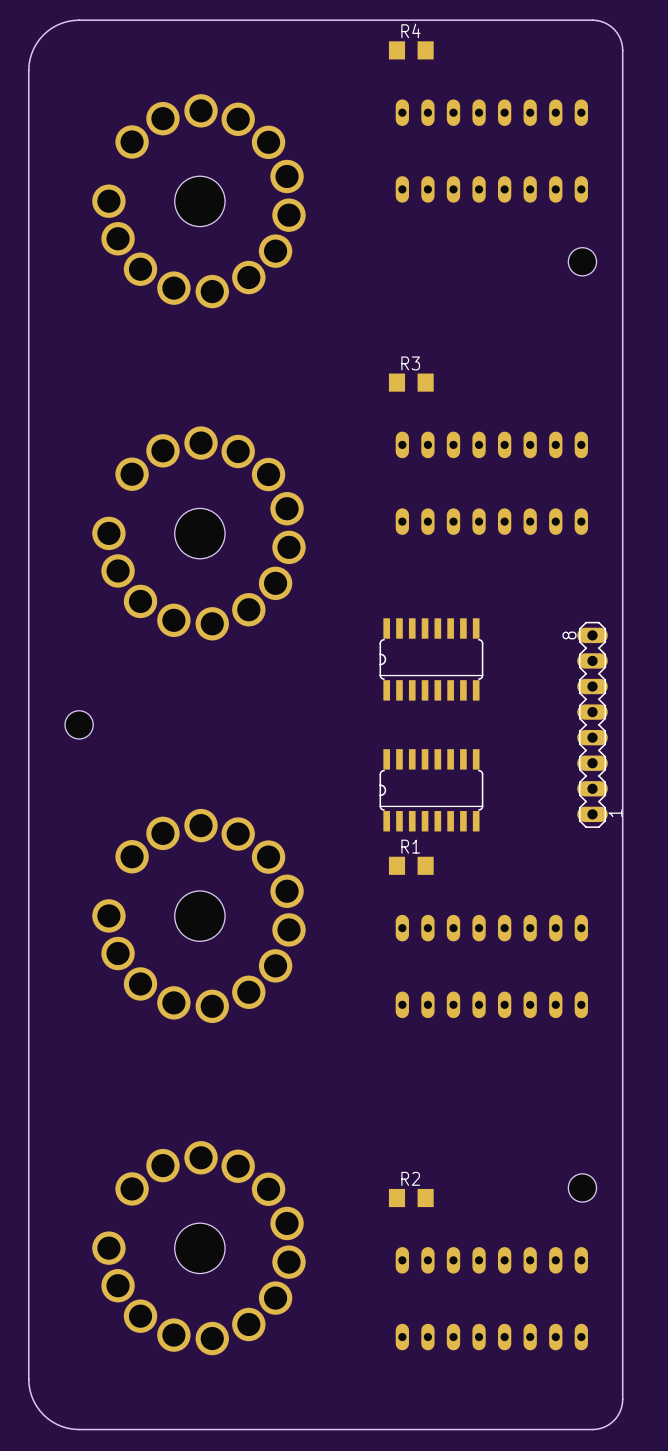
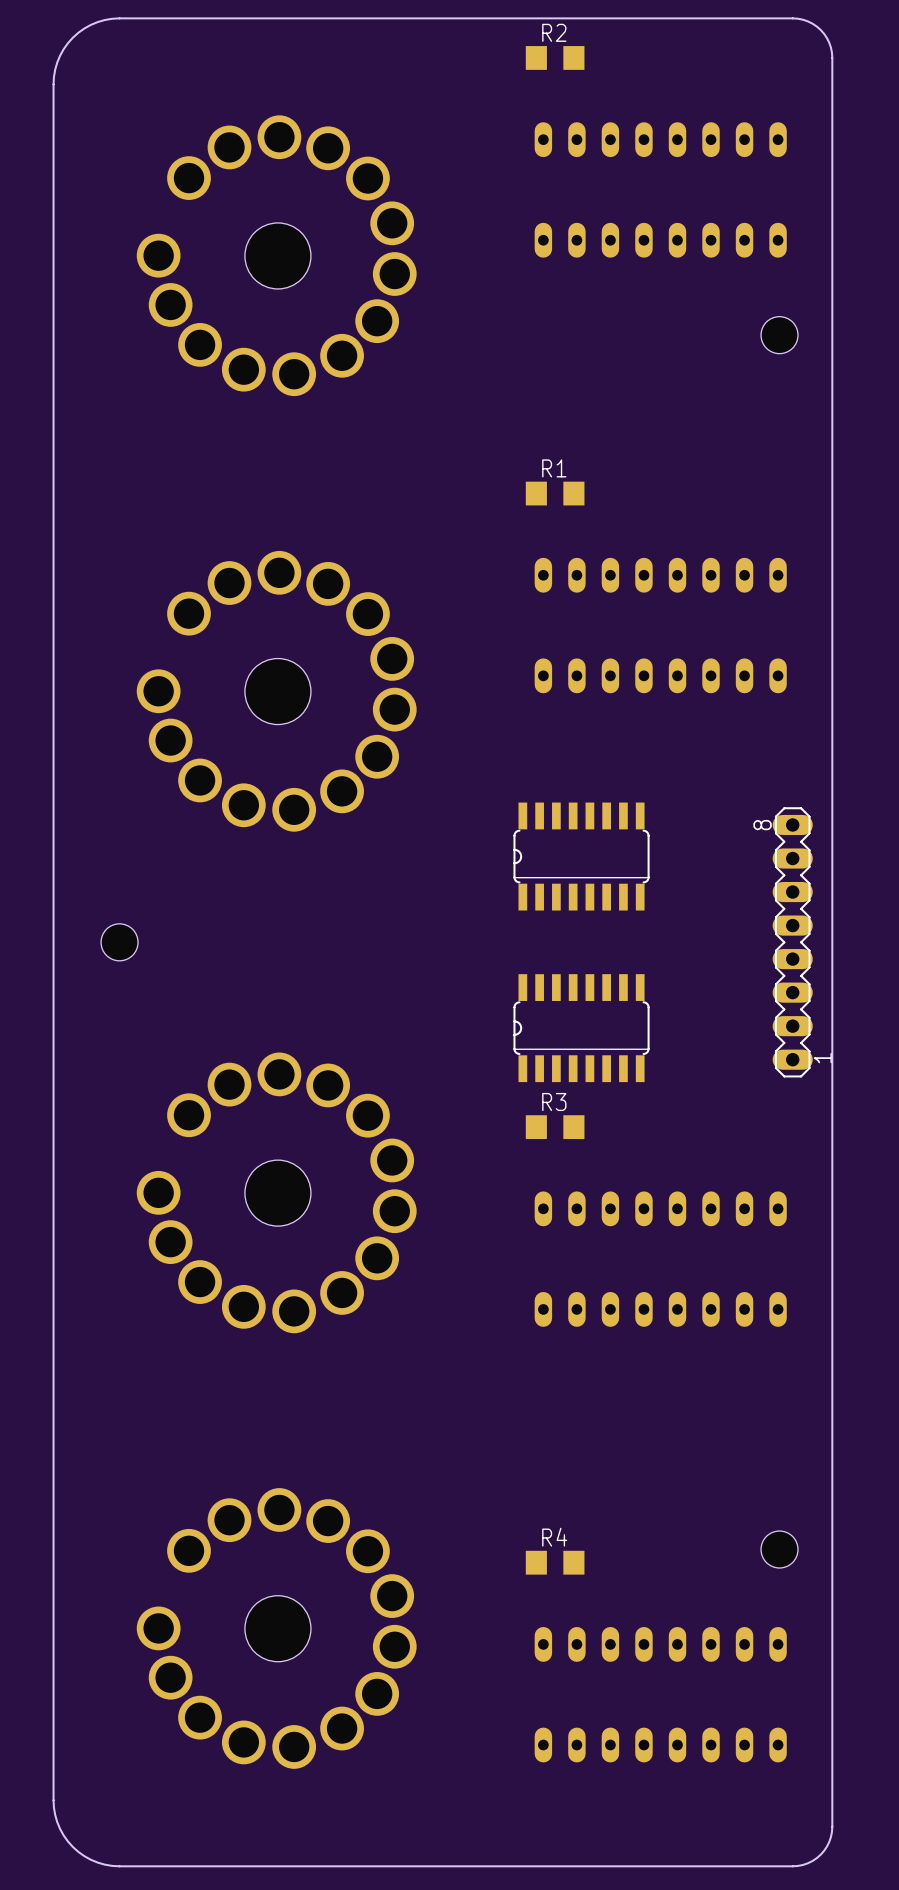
R4 name: R4 (410, 30) -> R2 (554, 32)
R3 name: R3 (410, 363) -> R1 (554, 468)
R1 name: R1 (410, 846) -> R3 (554, 1101)
R2 name: R2 (410, 1178) -> R4 (554, 1537)

